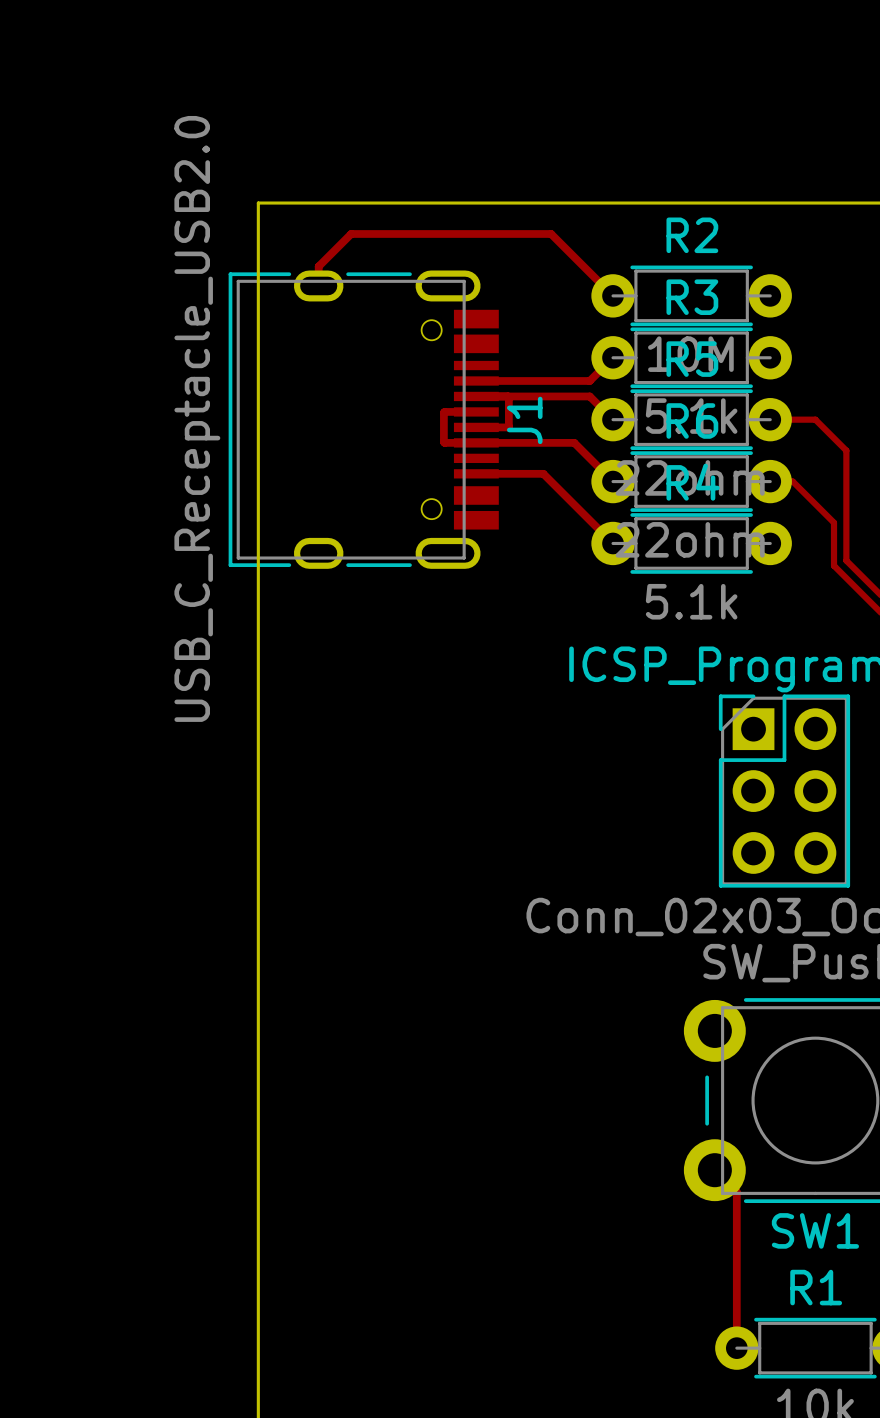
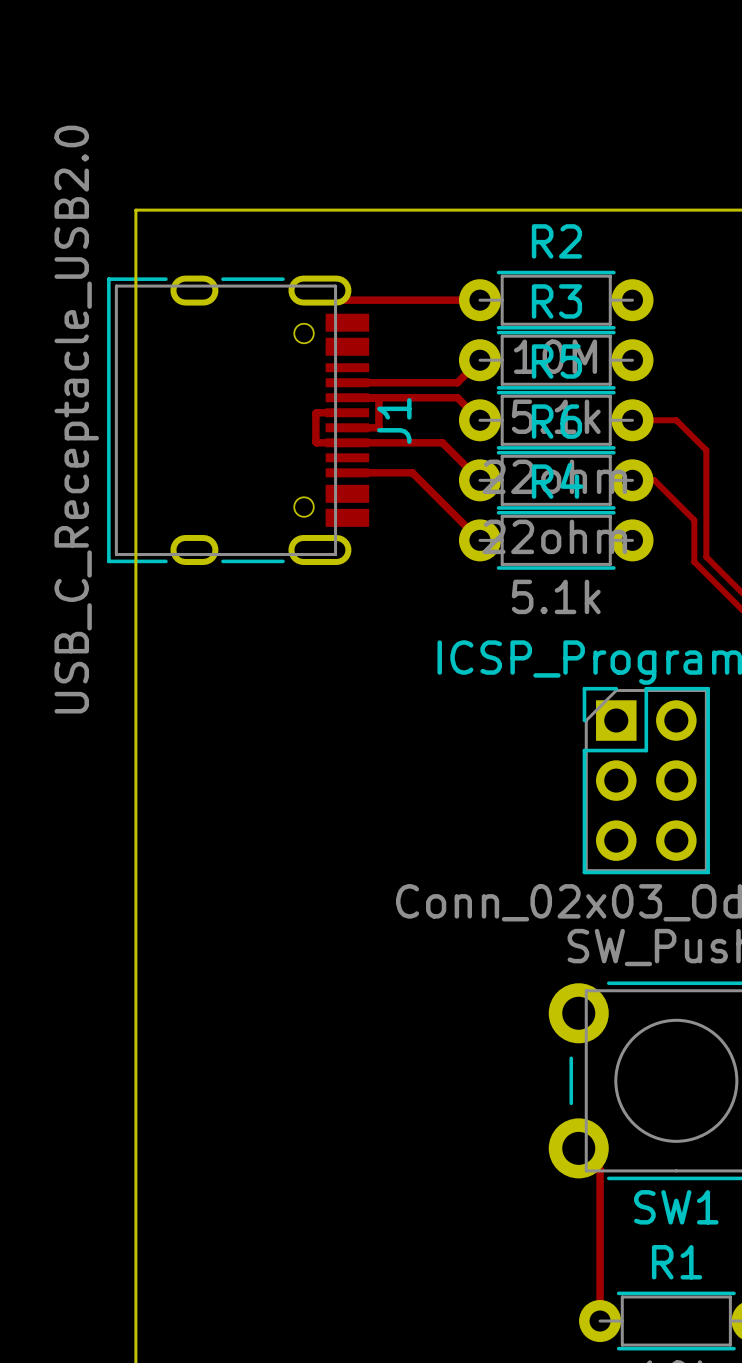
top track: (318, 285) (318, 266) (351, 233) (551, 233) (613, 295) -> (329, 300) (479, 300)

